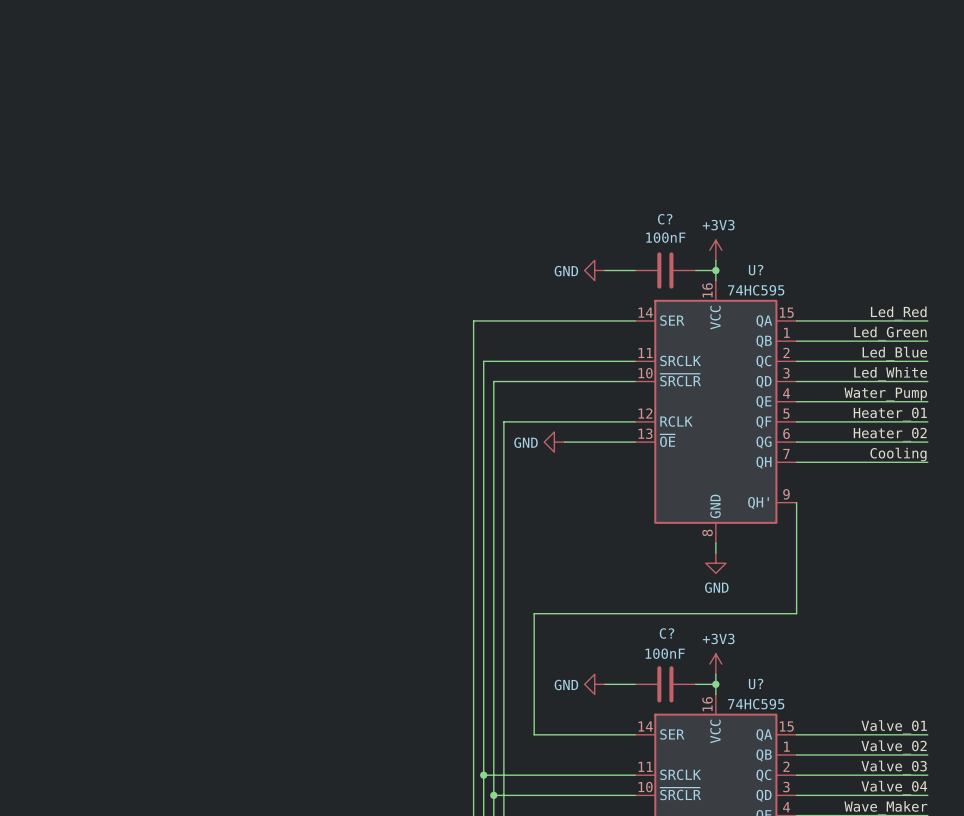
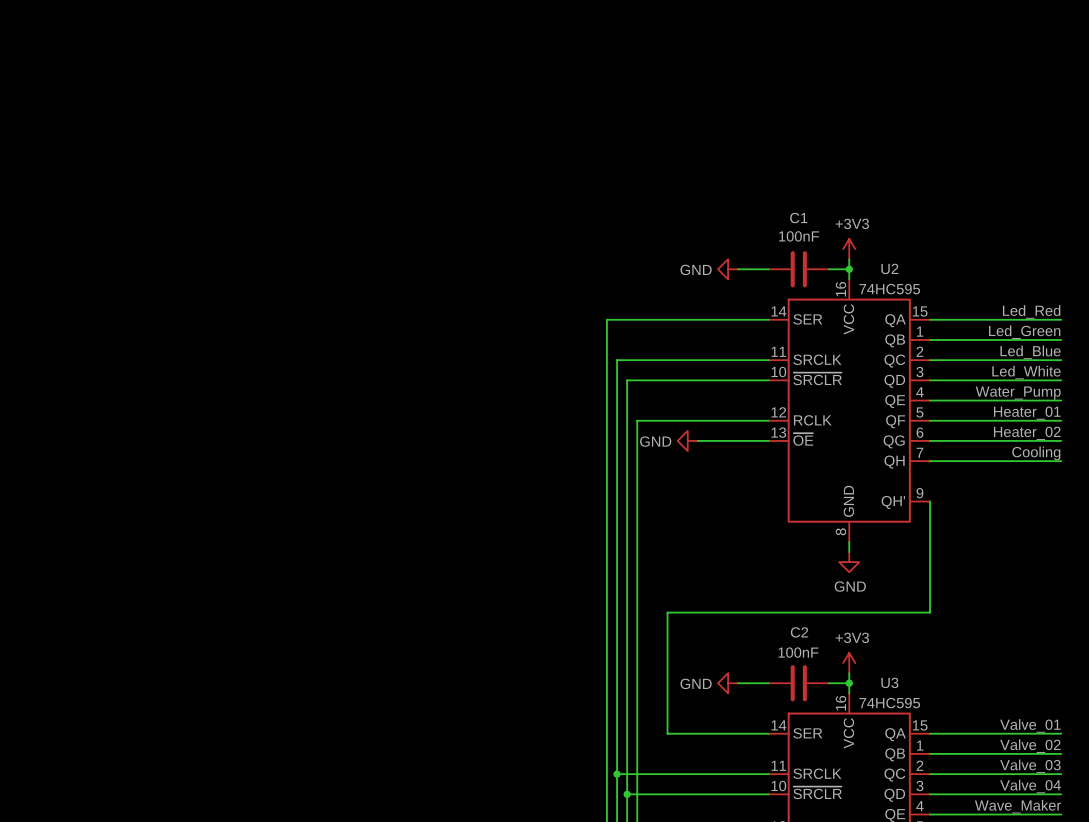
C? name: C? (665, 219) -> C1 (798, 218)
U? name: U? (756, 270) -> U2 (889, 268)
C? name: C? (666, 633) -> C2 (799, 632)
U? name: U? (756, 683) -> U3 (889, 682)

